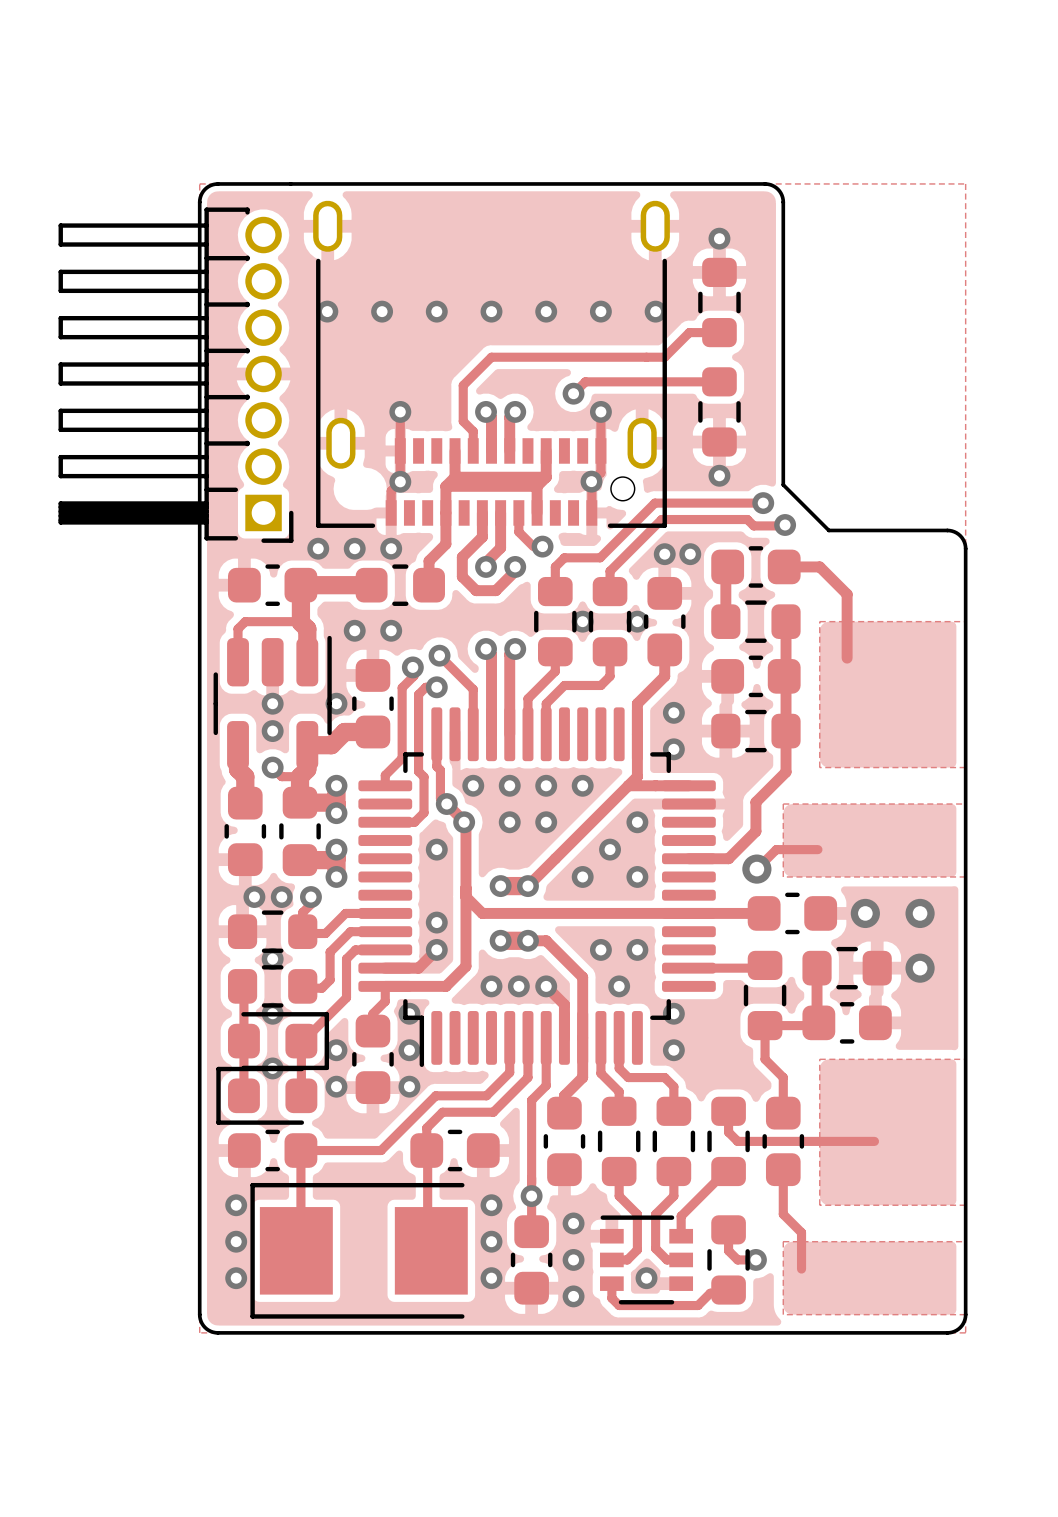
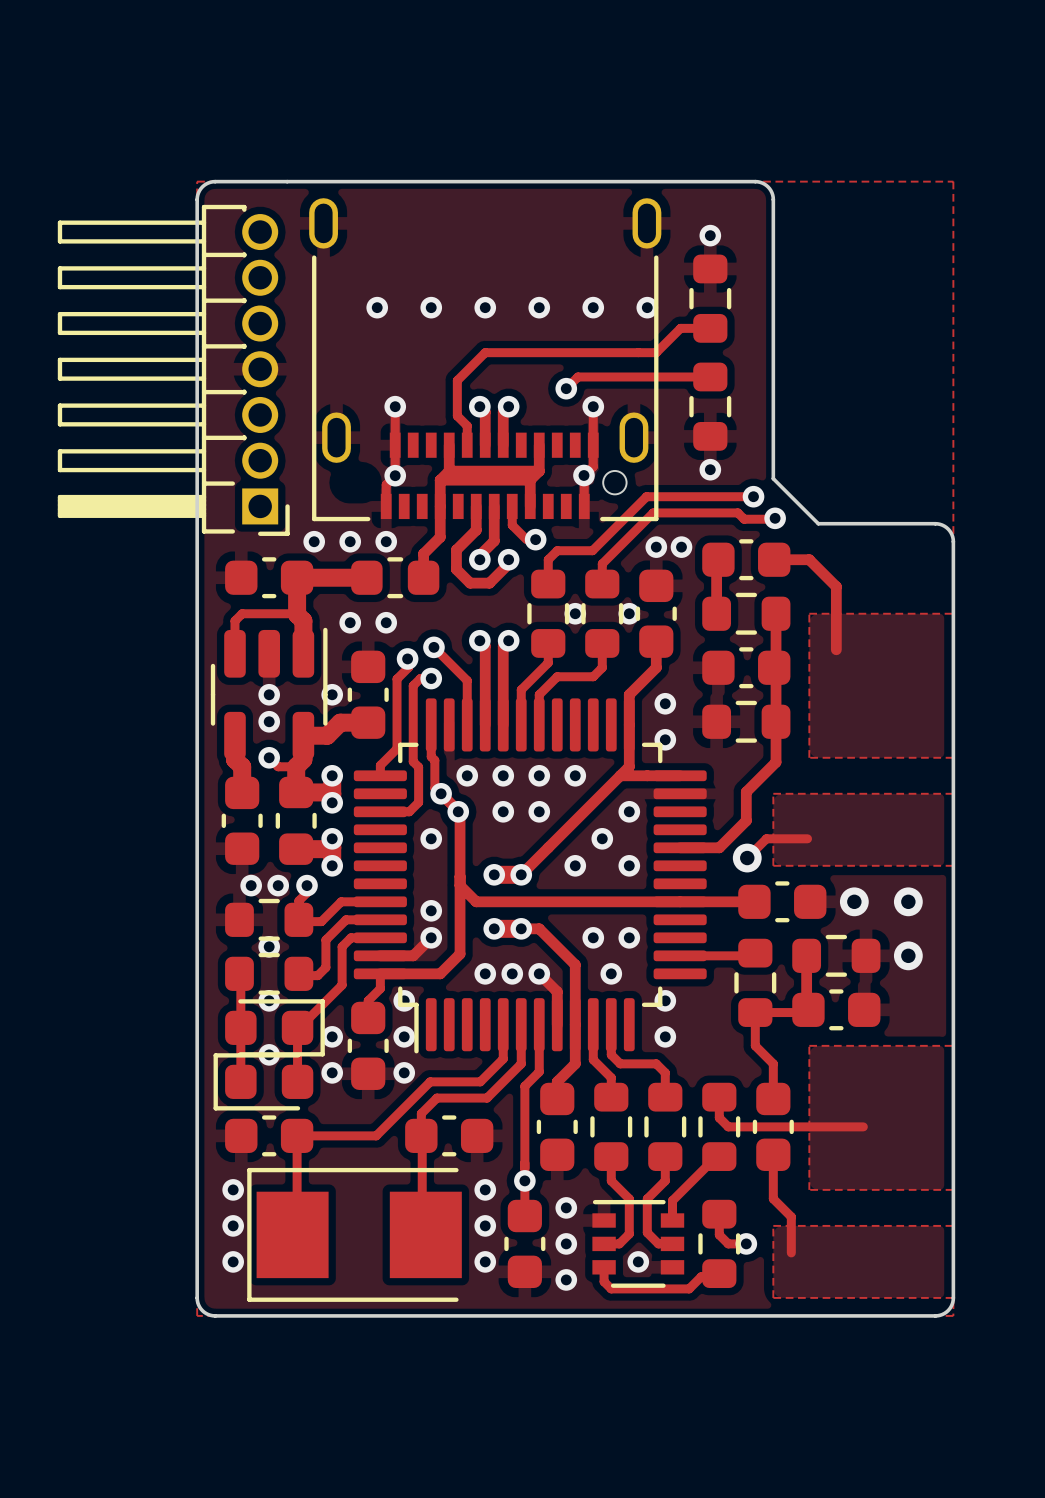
via: (327, 311) -> none

